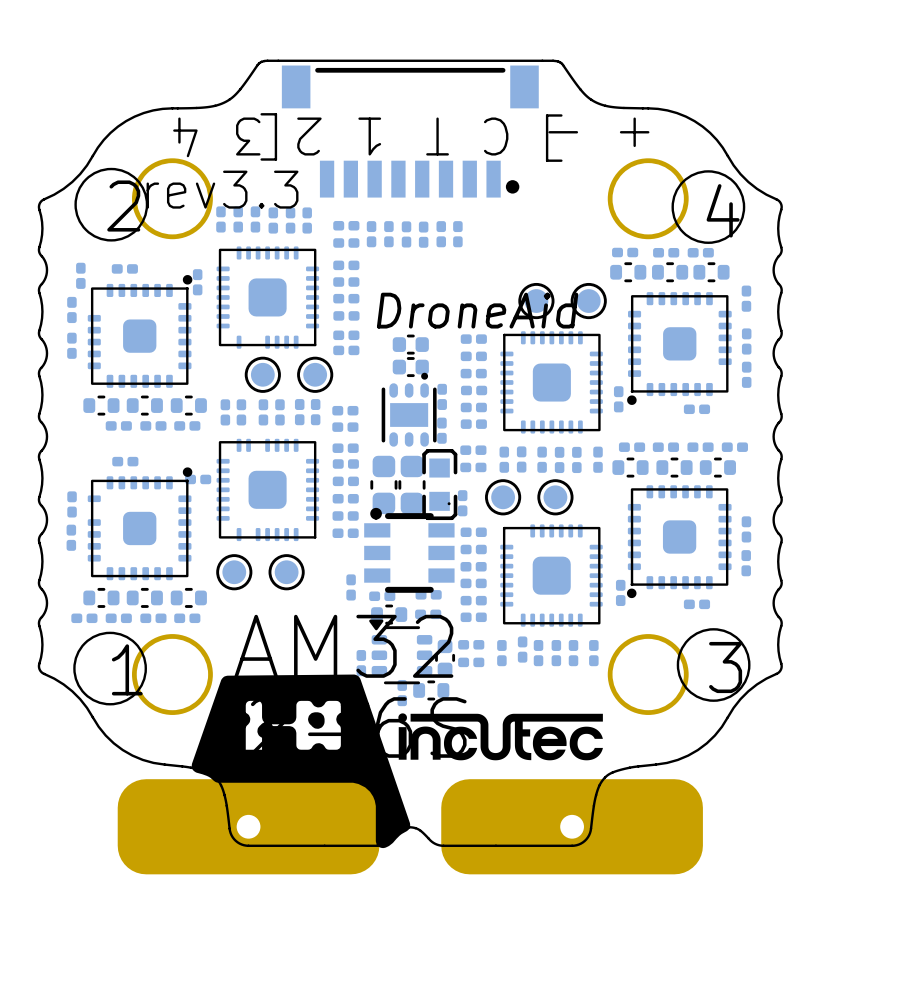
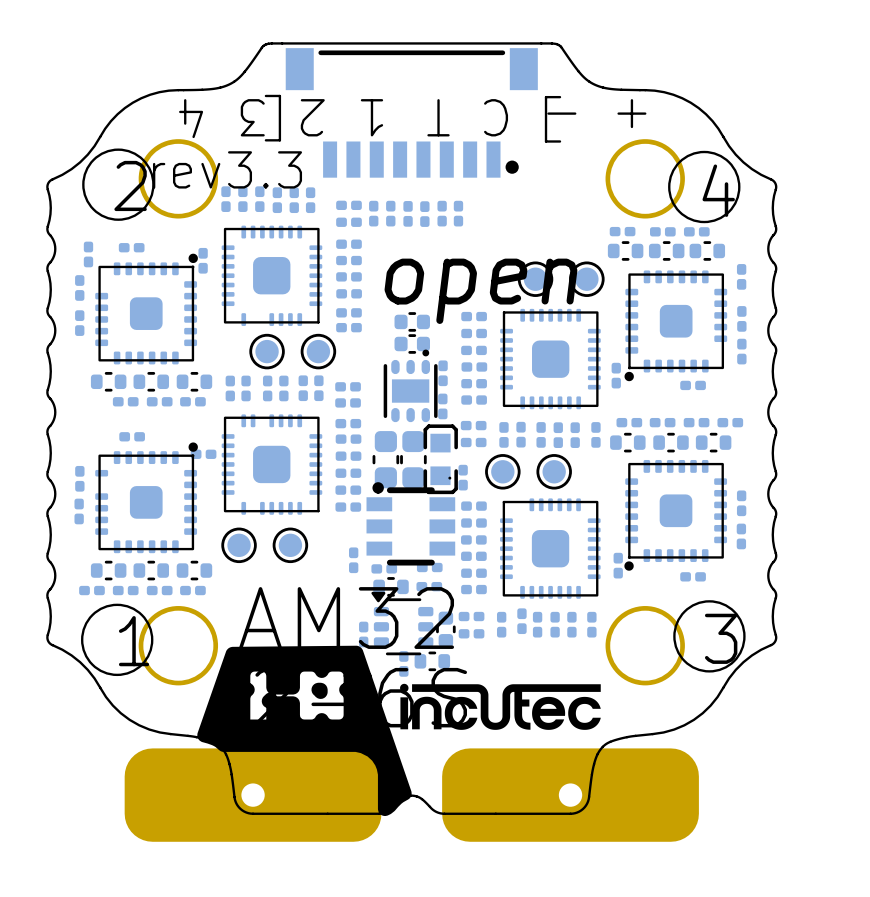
text: DroneAid (477, 310) -> open (480, 291)

